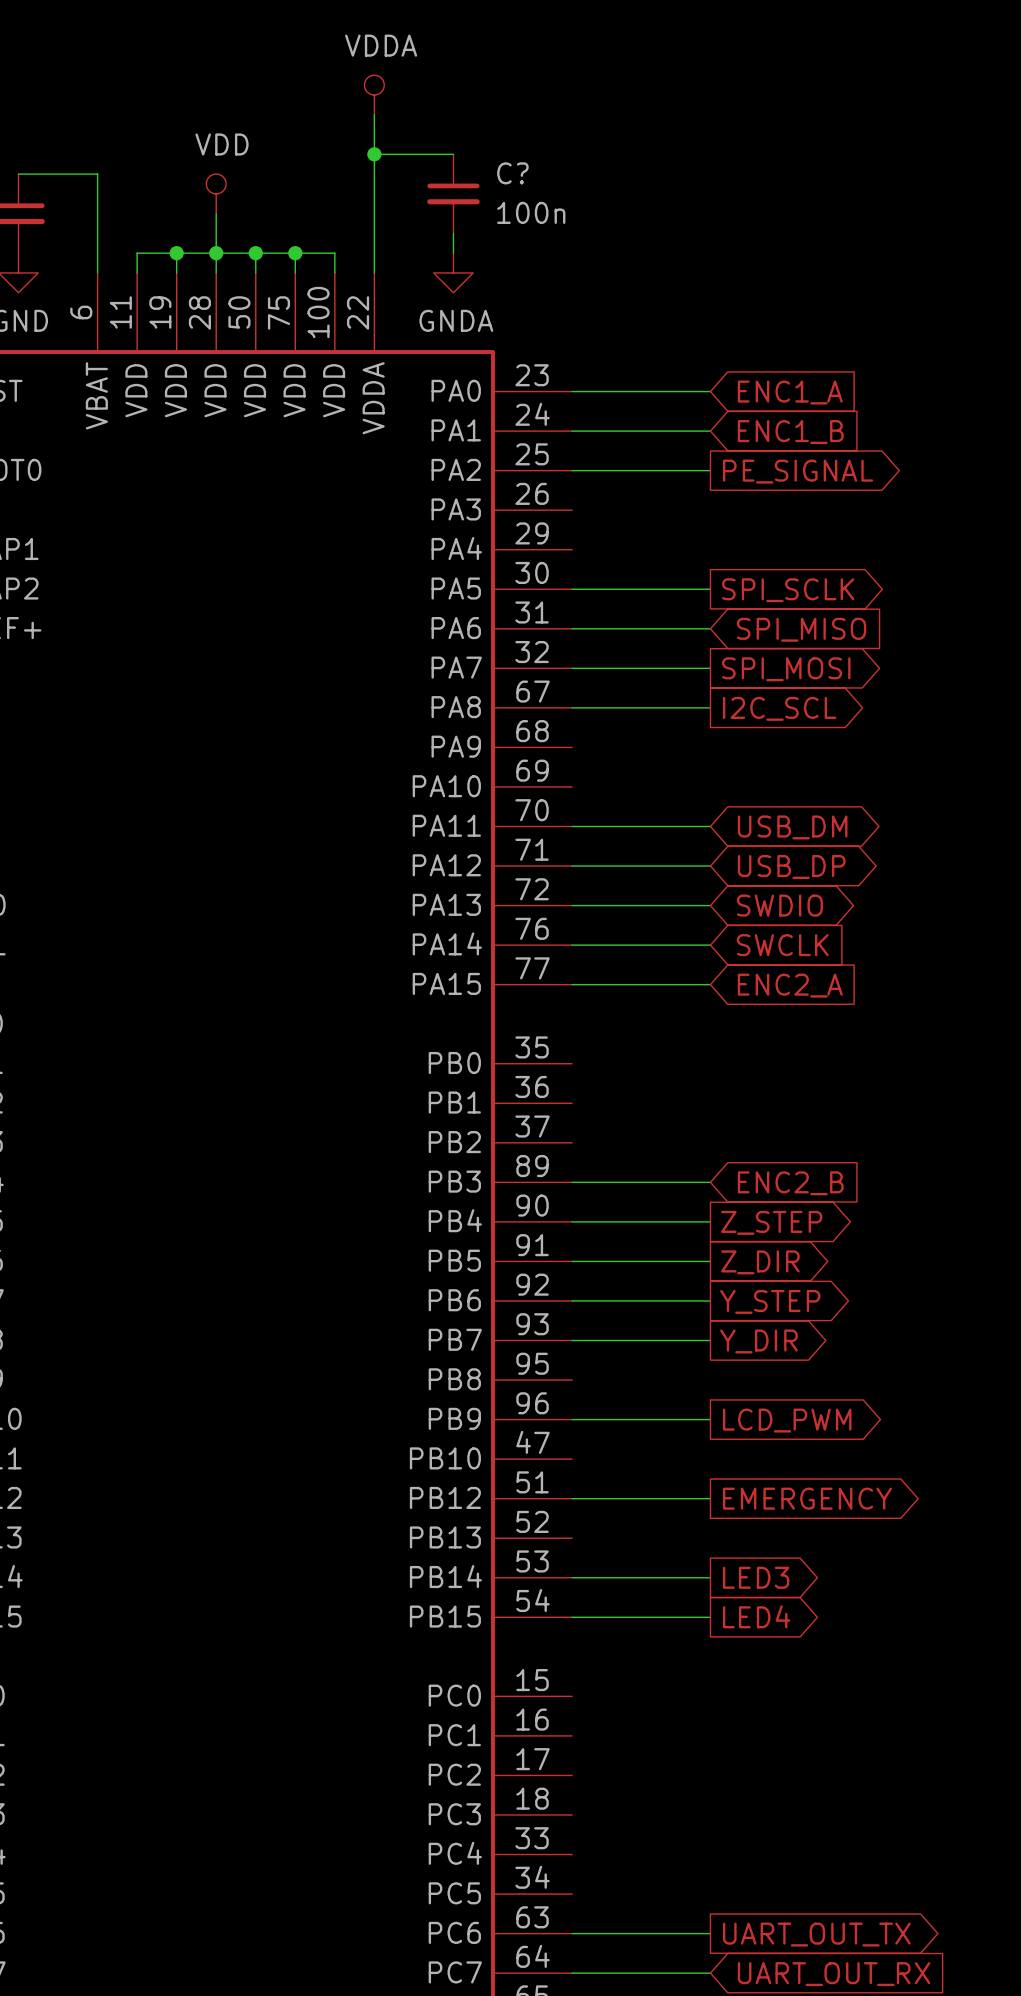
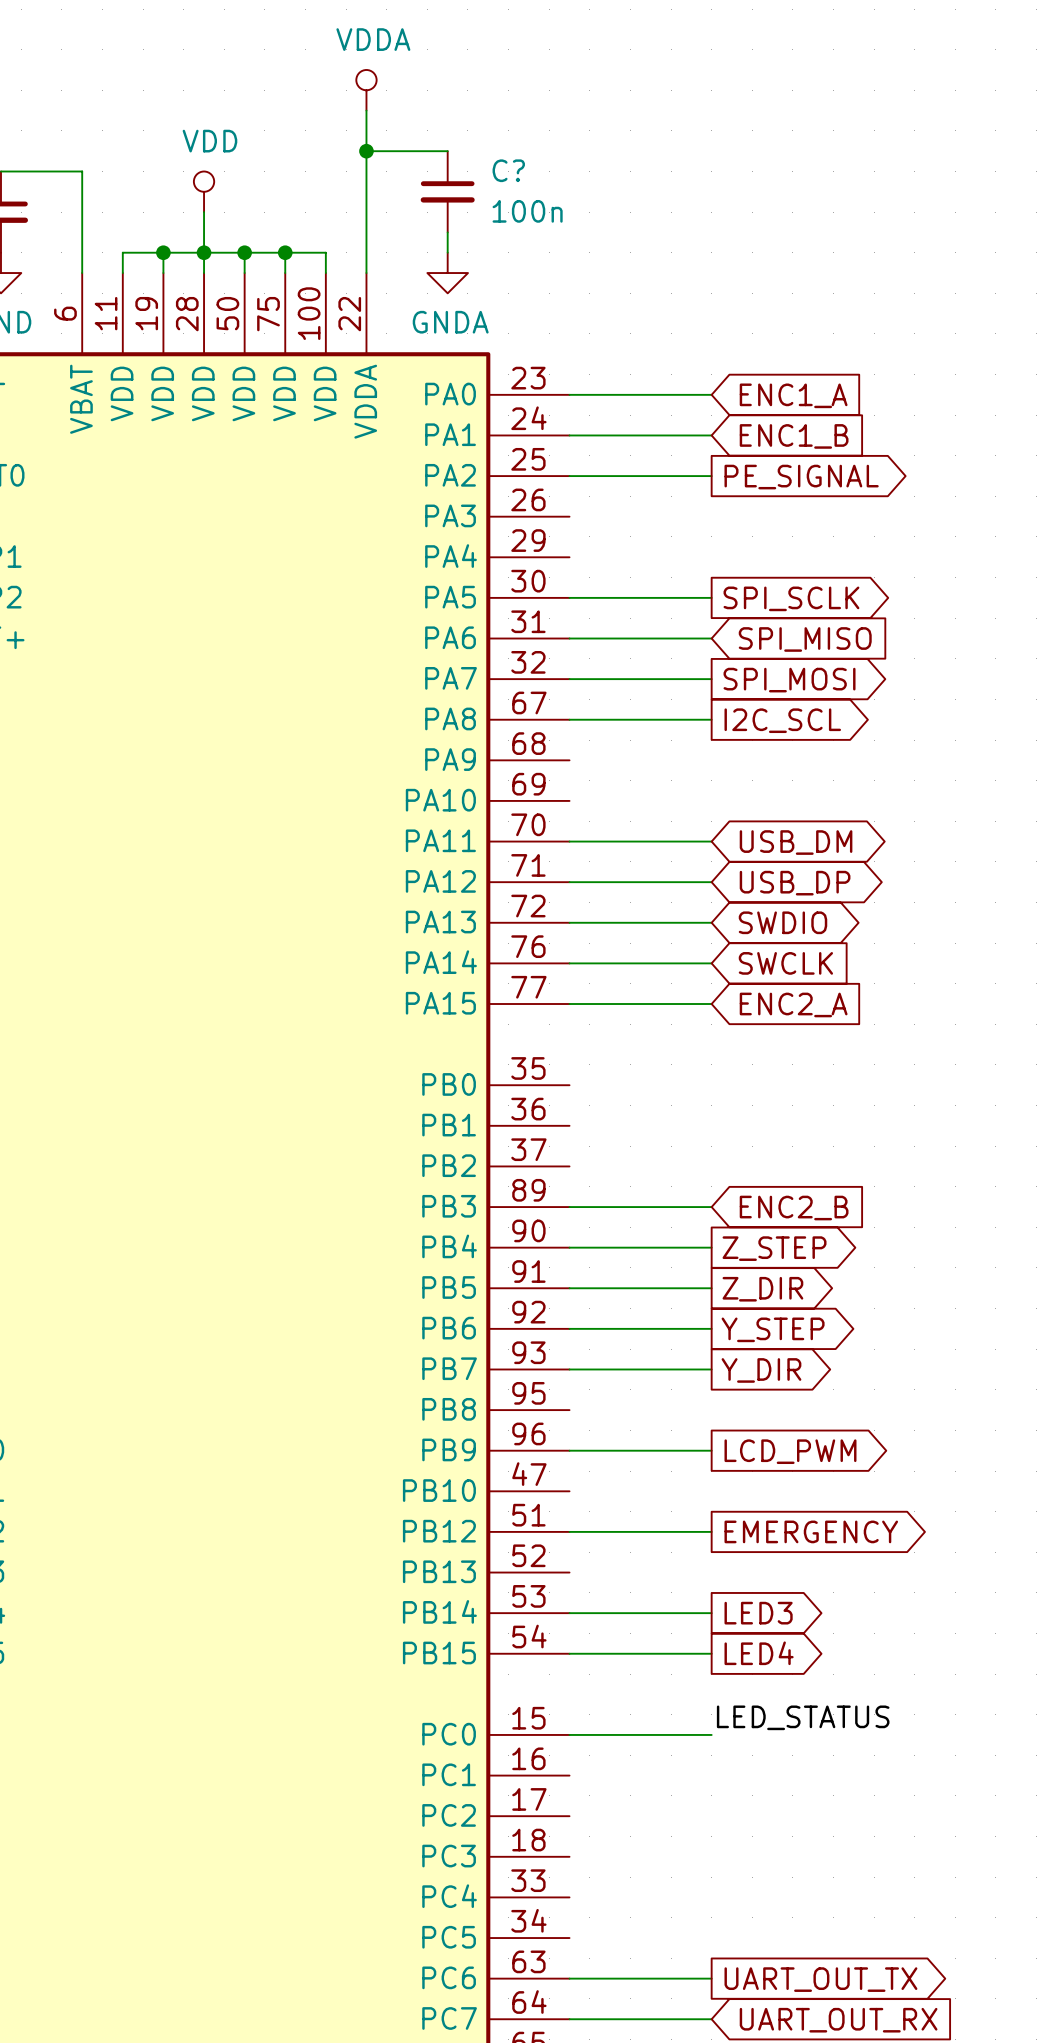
label: none -> LED_STATUS (803, 1717)
wire: none -> (569, 1734) (711, 1734)

